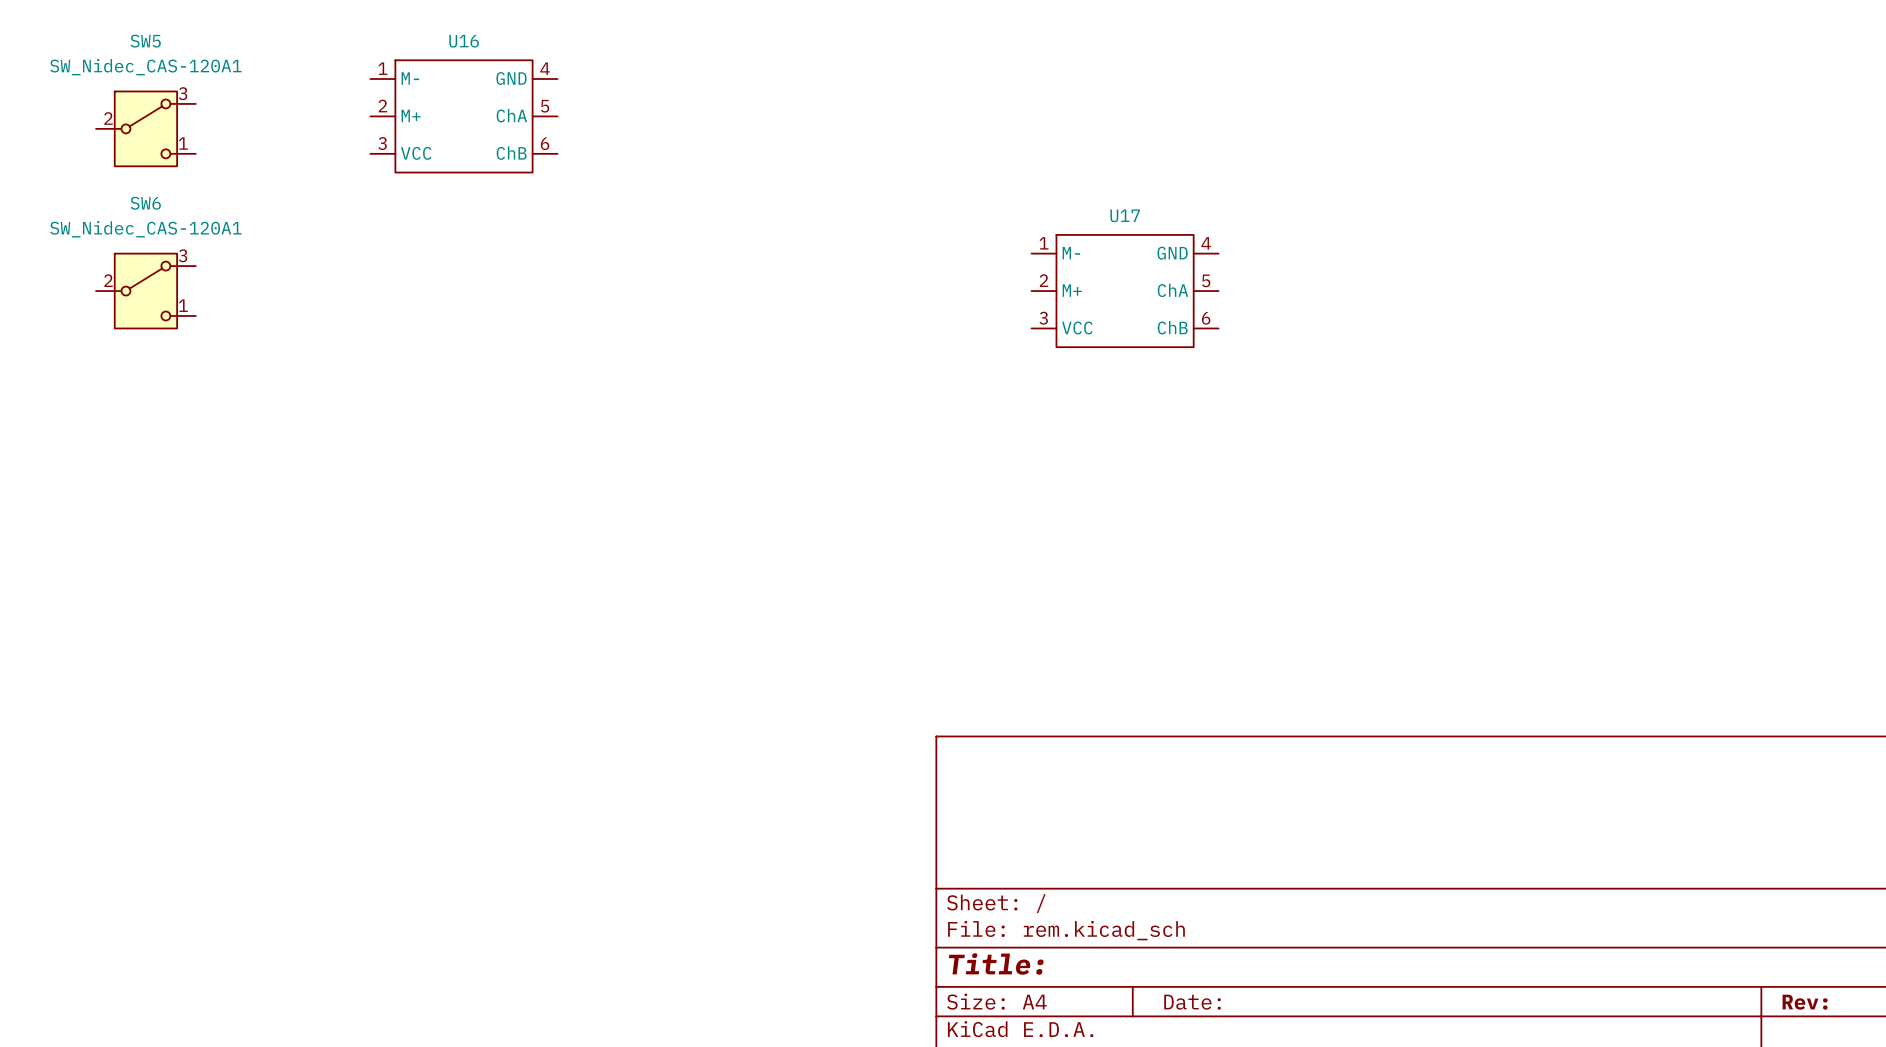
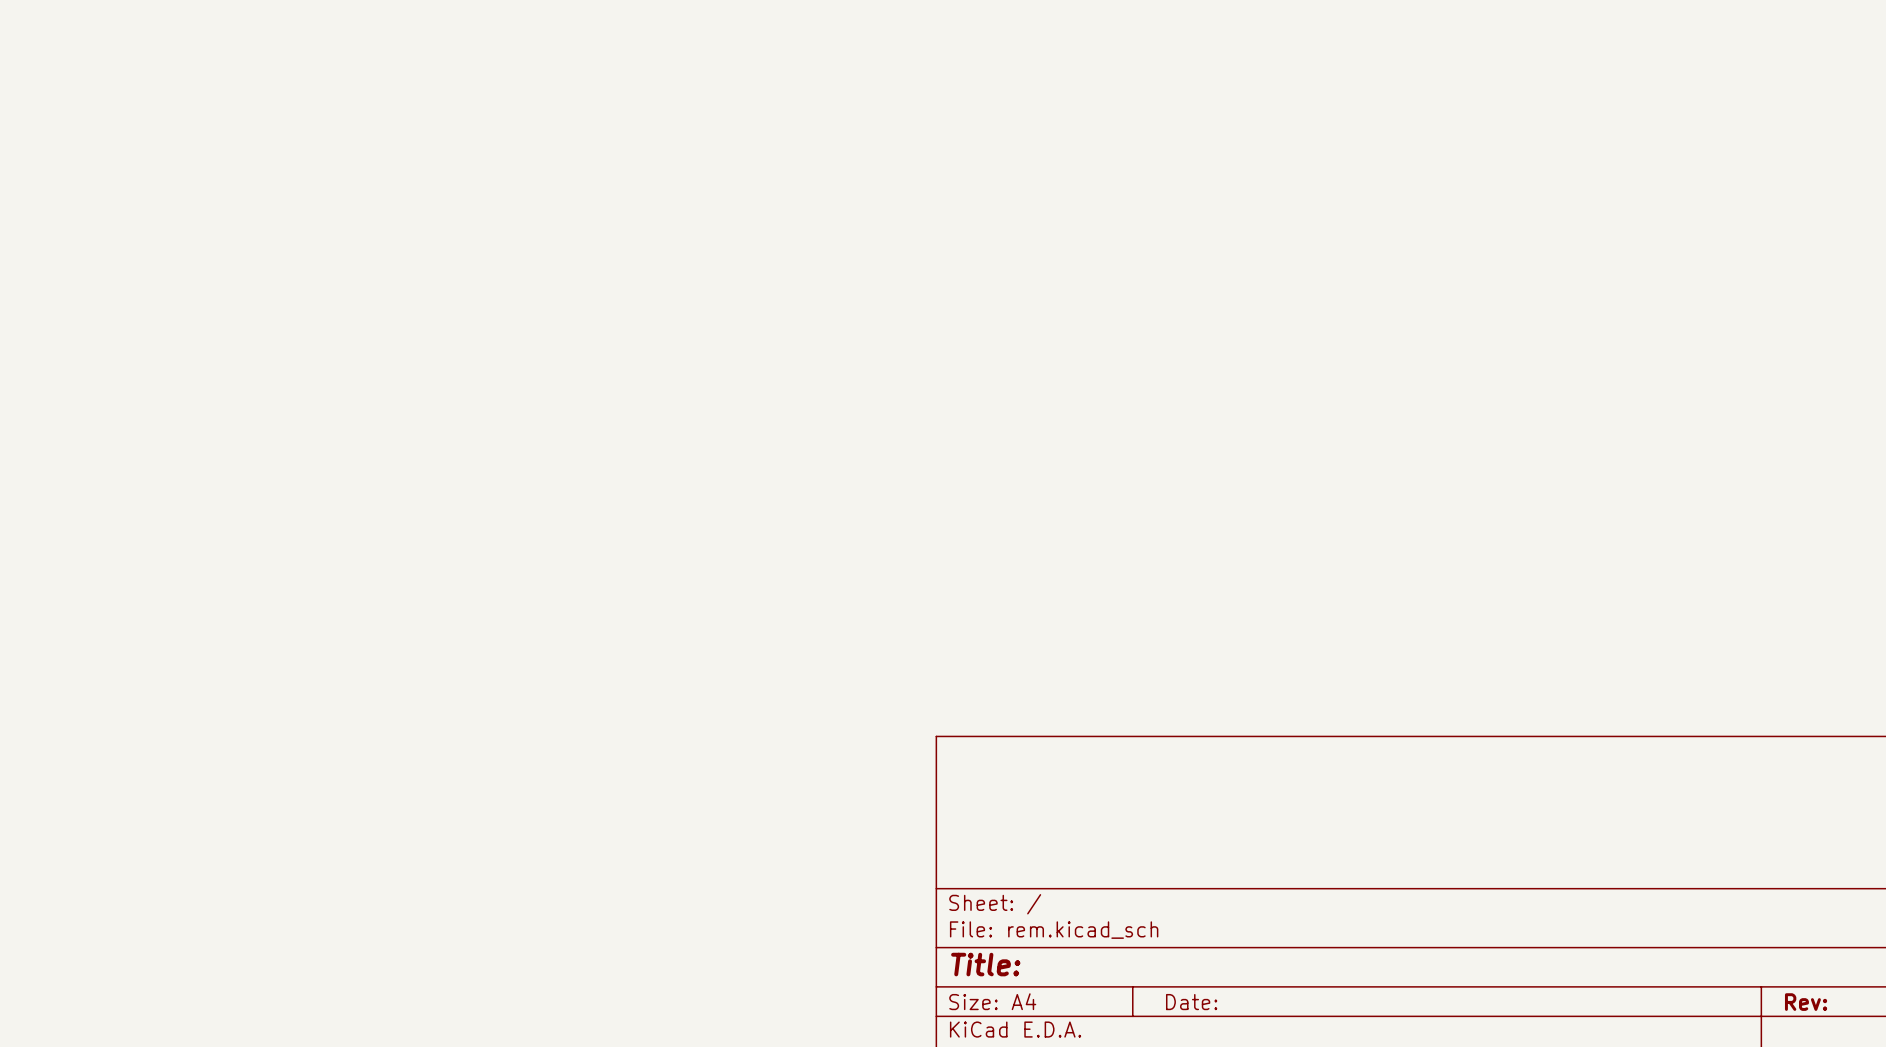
U16: (463, 116) -> none
SW5: SW_Nidec_CAS-120A1 (145, 128) -> none
SW6: SW_Nidec_CAS-120A1 (145, 291) -> none
U17: (1125, 291) -> none

